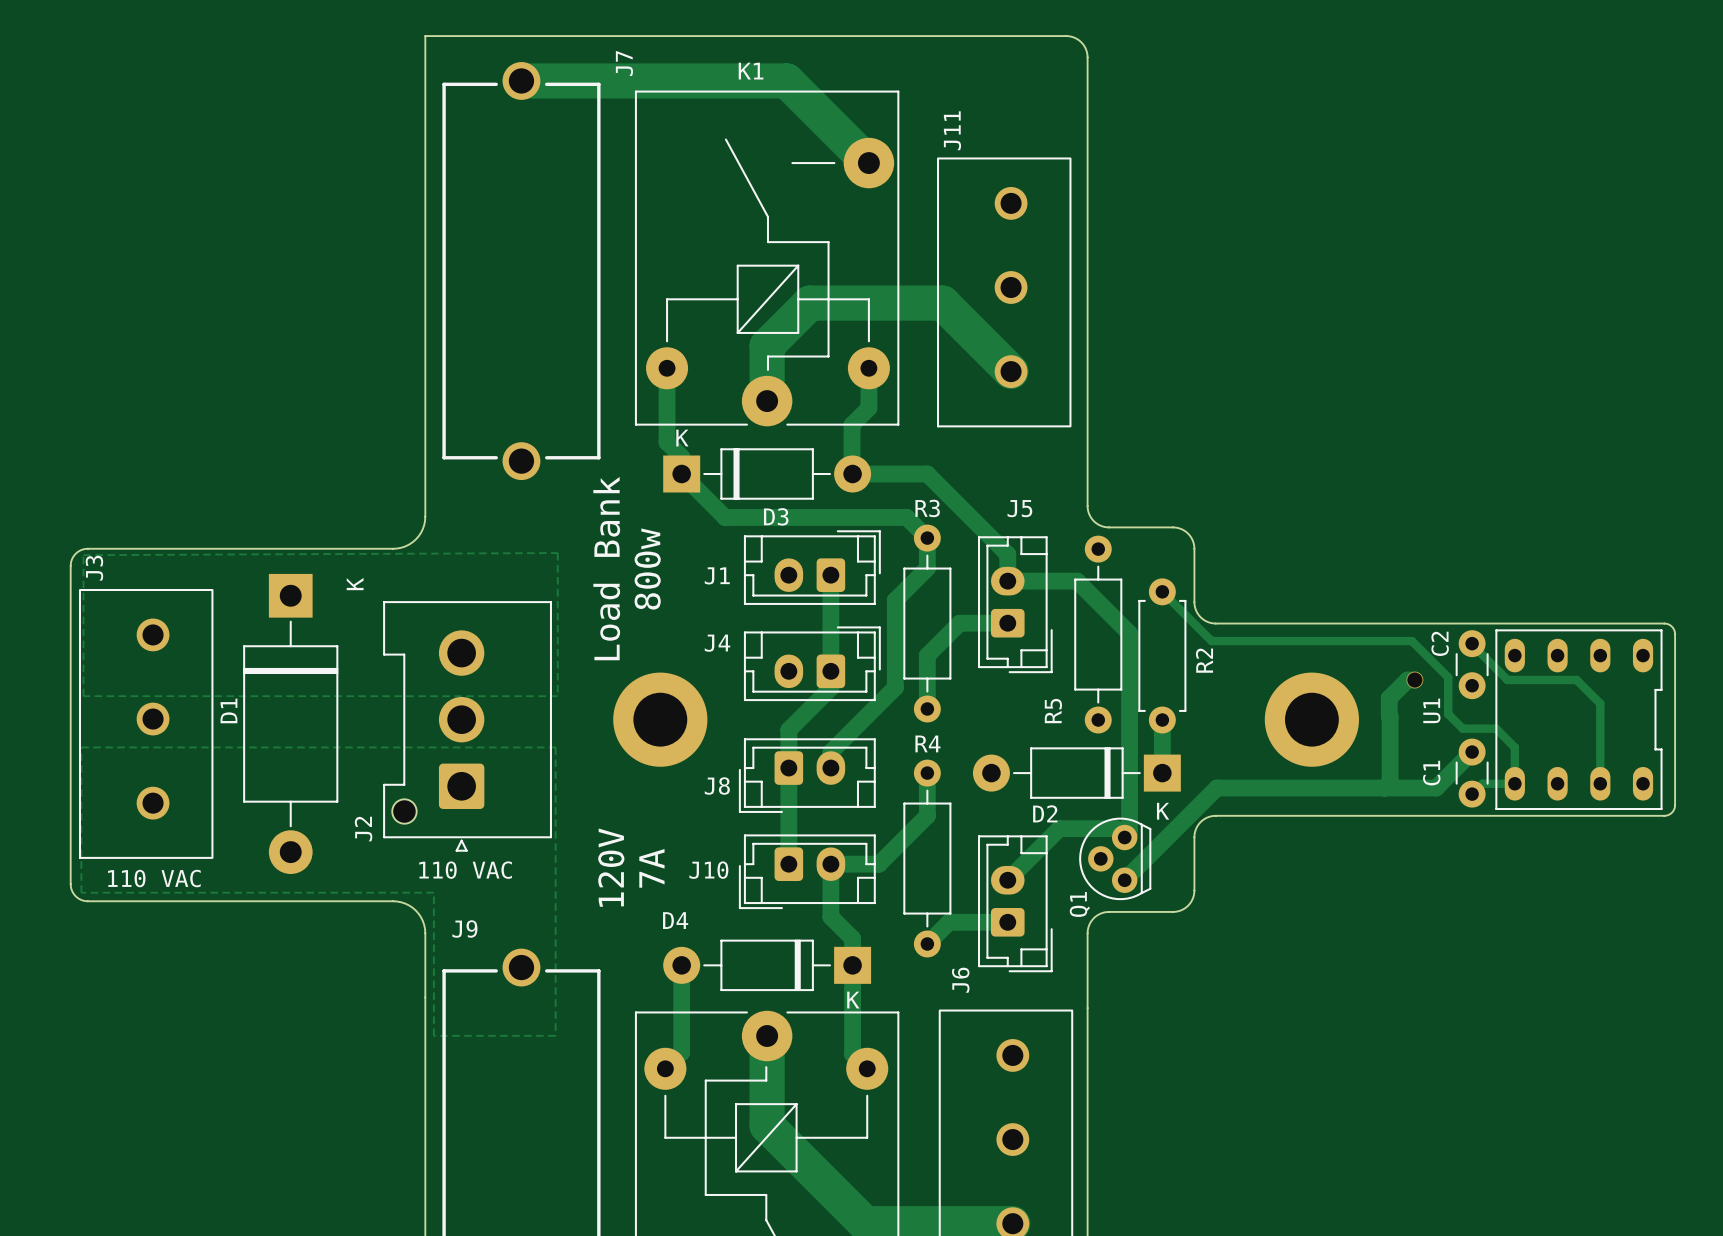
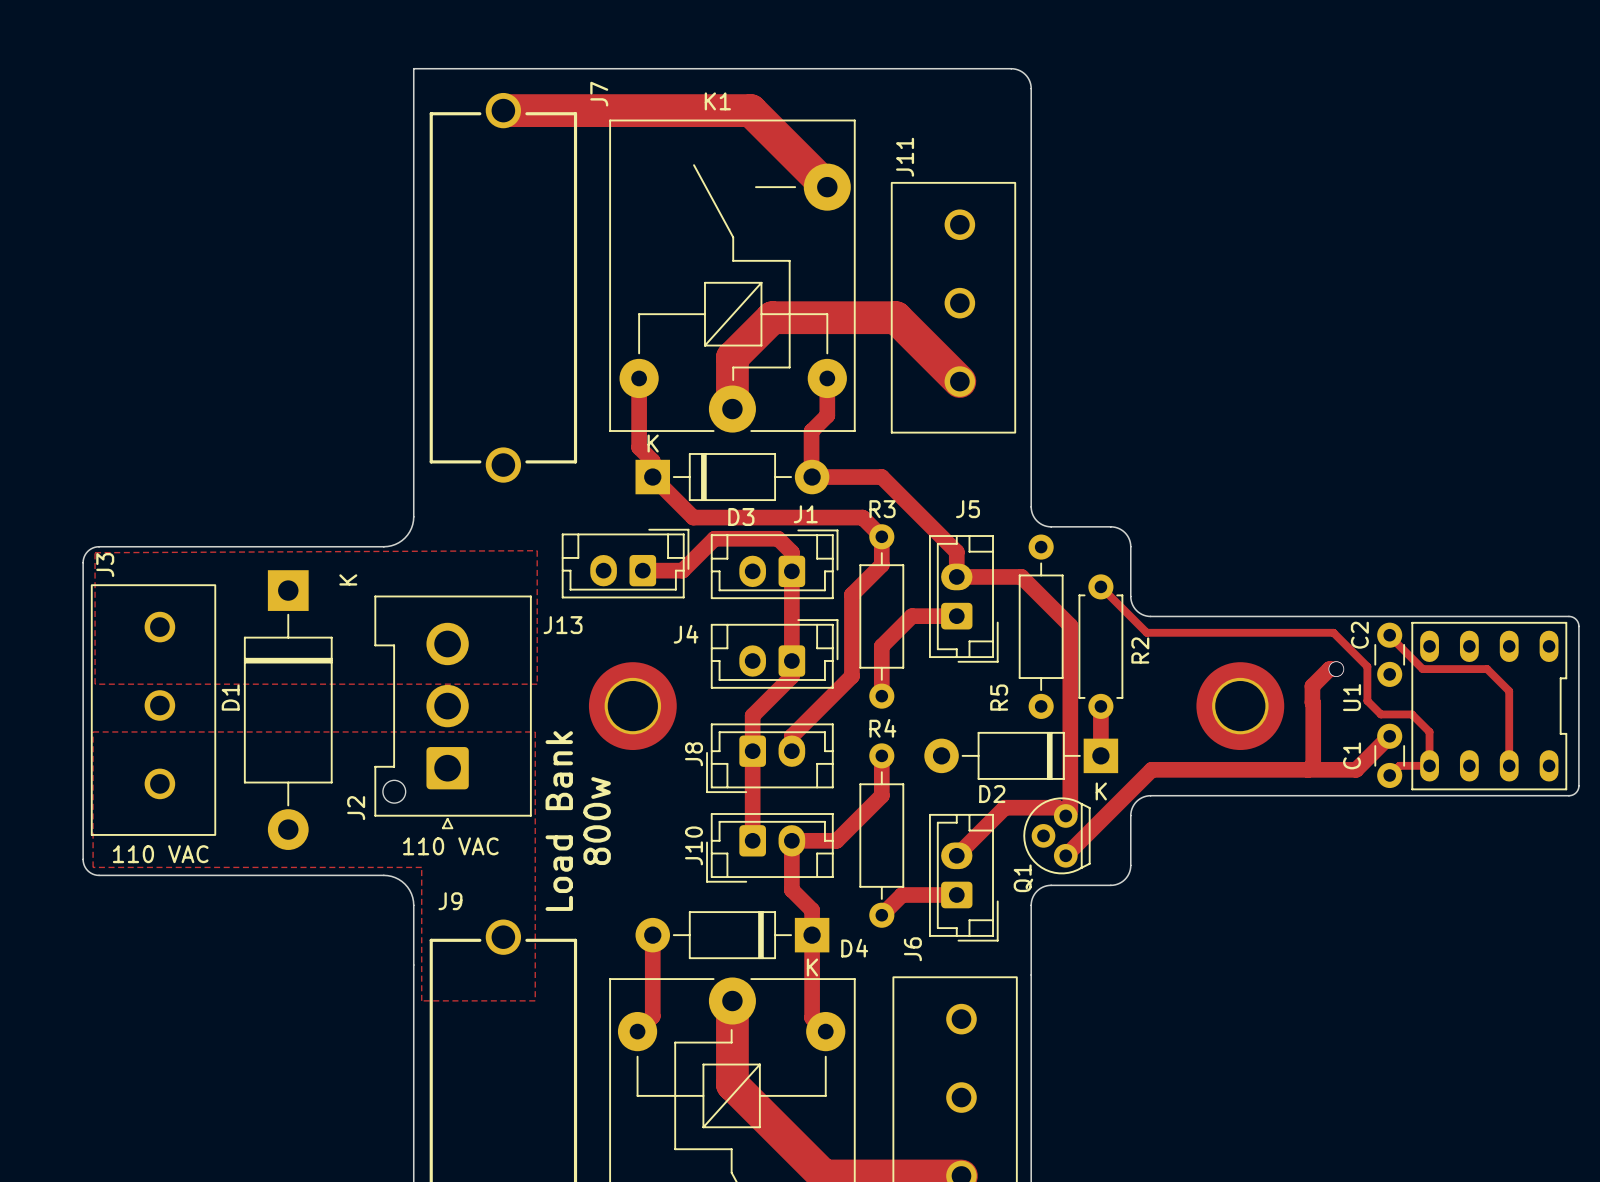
J13: none -> (625, 563)
text position: Load Bank (606, 568) -> Load Bank (559, 821)
text position: 800w (647, 569) -> 800w (597, 821)
track: none -> (642, 570) (682, 570) (714, 538) (778, 538) (791, 552) (791, 571)
J1 name position: J1 (717, 575) -> J1 (805, 514)
J8 name rotation: 0° (717, 786) -> 90° counterclockwise (694, 754)
text: 120V (611, 867) -> none
text: 7A (651, 868) -> none
J10 name rotation: 0° (708, 870) -> 90° counterclockwise (694, 845)
D4 name position: D4 (675, 920) -> D4 (854, 948)

